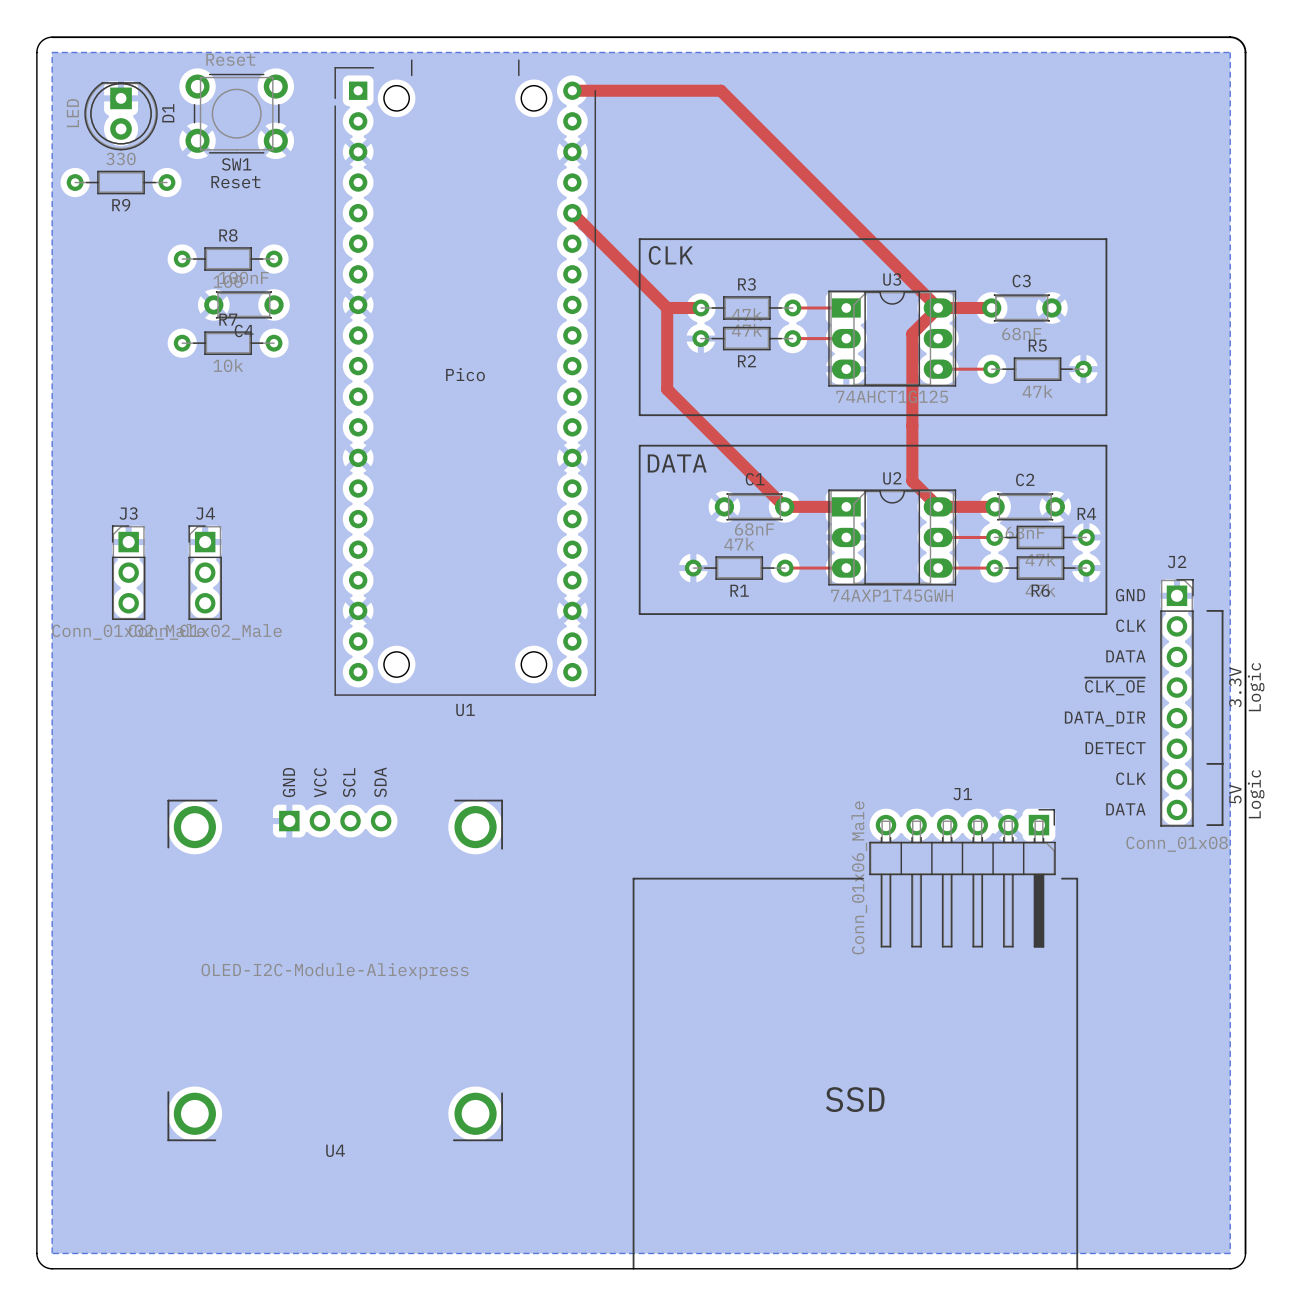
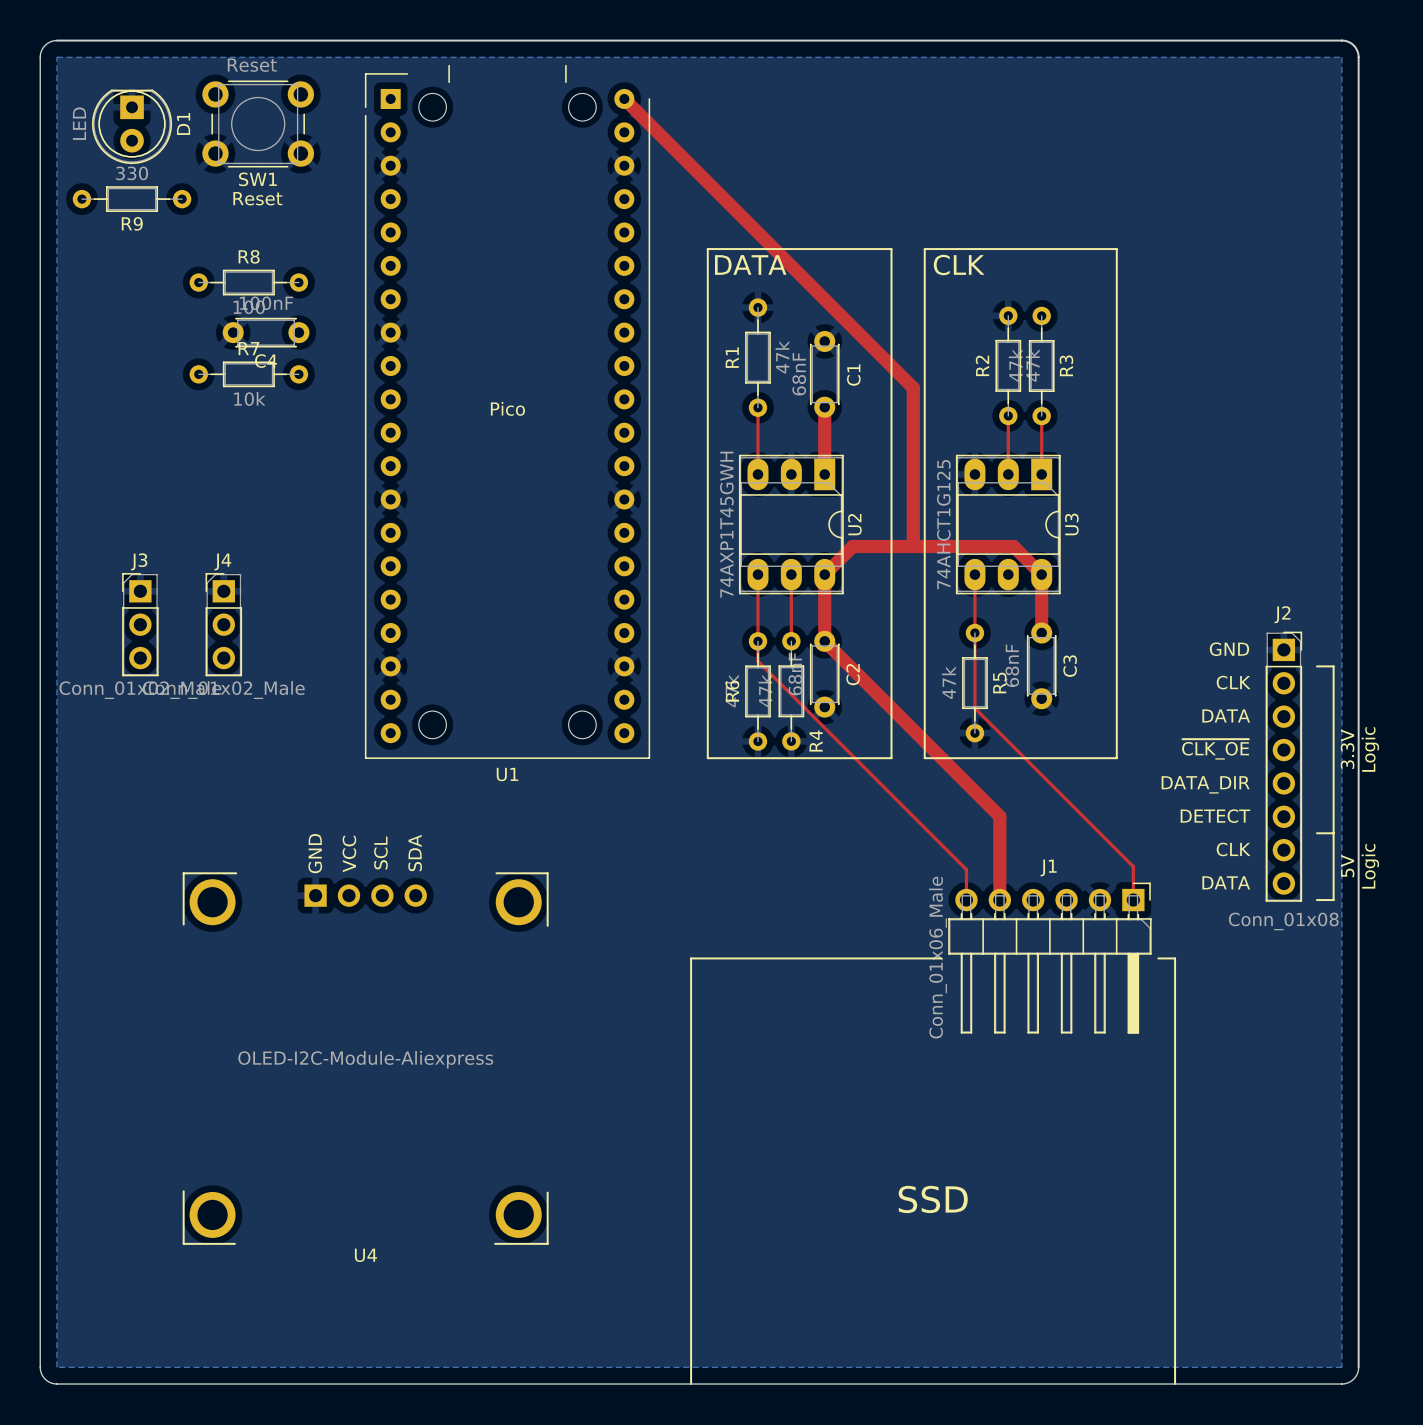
top track: (572, 90) (720, 90) (938, 307) -> (624, 98) (913, 387) (913, 546)
top track: (572, 213) (667, 307) -> none
line: none -> (707, 249) (891, 249) (891, 758) (707, 758) (707, 249)
line: none -> (924, 249) (924, 758) (1116, 758) (1116, 249) (924, 249)
line: (639, 239) (639, 415) (1106, 415) (1106, 239) (639, 239) -> none
text position: CLK (670, 255) -> CLK (959, 265)
top track: (667, 307) (667, 389) (784, 506) (846, 506) -> none
top track: (667, 307) (700, 307) -> none
R3 rotation: 0° (746, 307) -> 90° clockwise (1041, 365)
R3 position: (746, 307) -> (1041, 365)
top track: (792, 307) (846, 307) -> none
top track: (938, 307) (991, 307) -> none
top track: (938, 307) (912, 333) (912, 481) (938, 506) (995, 506) -> none
C3 rotation: 0° (1021, 307) -> 90° clockwise (1041, 665)
C3 position: (1021, 307) -> (1041, 665)
R2 rotation: 0° (746, 338) -> 90° clockwise (1008, 365)
R2 position: (746, 338) -> (1008, 365)
top track: (792, 338) (846, 338) -> none
U3 rotation: 0° (892, 338) -> 90° clockwise (1008, 524)
U3 position: (892, 338) -> (1008, 524)
top track: (938, 369) (991, 369) -> none
R5 rotation: 0° (1037, 369) -> 90° clockwise (974, 683)
R5 position: (1037, 369) -> (974, 683)
top track: none -> (757, 407) (757, 474)
top track: none -> (824, 407) (824, 474)
top track: none -> (1008, 415) (1008, 474)
top track: none -> (1041, 416) (1041, 474)
line: (639, 445) (1106, 445) (1106, 614) (639, 614) (639, 445) -> none
text position: DATA (677, 463) -> DATA (750, 264)
C1 rotation: 0° (754, 506) -> 90° clockwise (824, 374)
C1 position: (754, 506) -> (824, 374)
C2 rotation: 0° (1025, 506) -> 90° clockwise (824, 674)
C2 position: (1025, 506) -> (824, 674)
top track: none -> (757, 574) (757, 661) (966, 869) (966, 900)
top track: none -> (791, 574) (791, 641)
top track: none -> (974, 574) (974, 708) (1133, 866) (1133, 900)
U2 rotation: 0° (892, 537) -> 90° clockwise (791, 524)
U2 position: (892, 537) -> (791, 524)
top track: (938, 537) (994, 537) -> none
R4 rotation: 0° (1040, 537) -> 90° clockwise (791, 691)
R4 position: (1040, 537) -> (791, 691)
R1 rotation: 0° (739, 568) -> 90° clockwise (757, 357)
R1 position: (739, 568) -> (757, 357)
top track: (785, 568) (846, 568) -> none
top track: (938, 568) (994, 568) -> none
R6 rotation: 0° (1040, 568) -> 90° clockwise (757, 691)
R6 position: (1040, 568) -> (757, 691)
top track: none -> (1041, 633) (1041, 574) (1013, 546) (852, 546) (824, 574) (824, 641) (999, 816) (999, 900)

